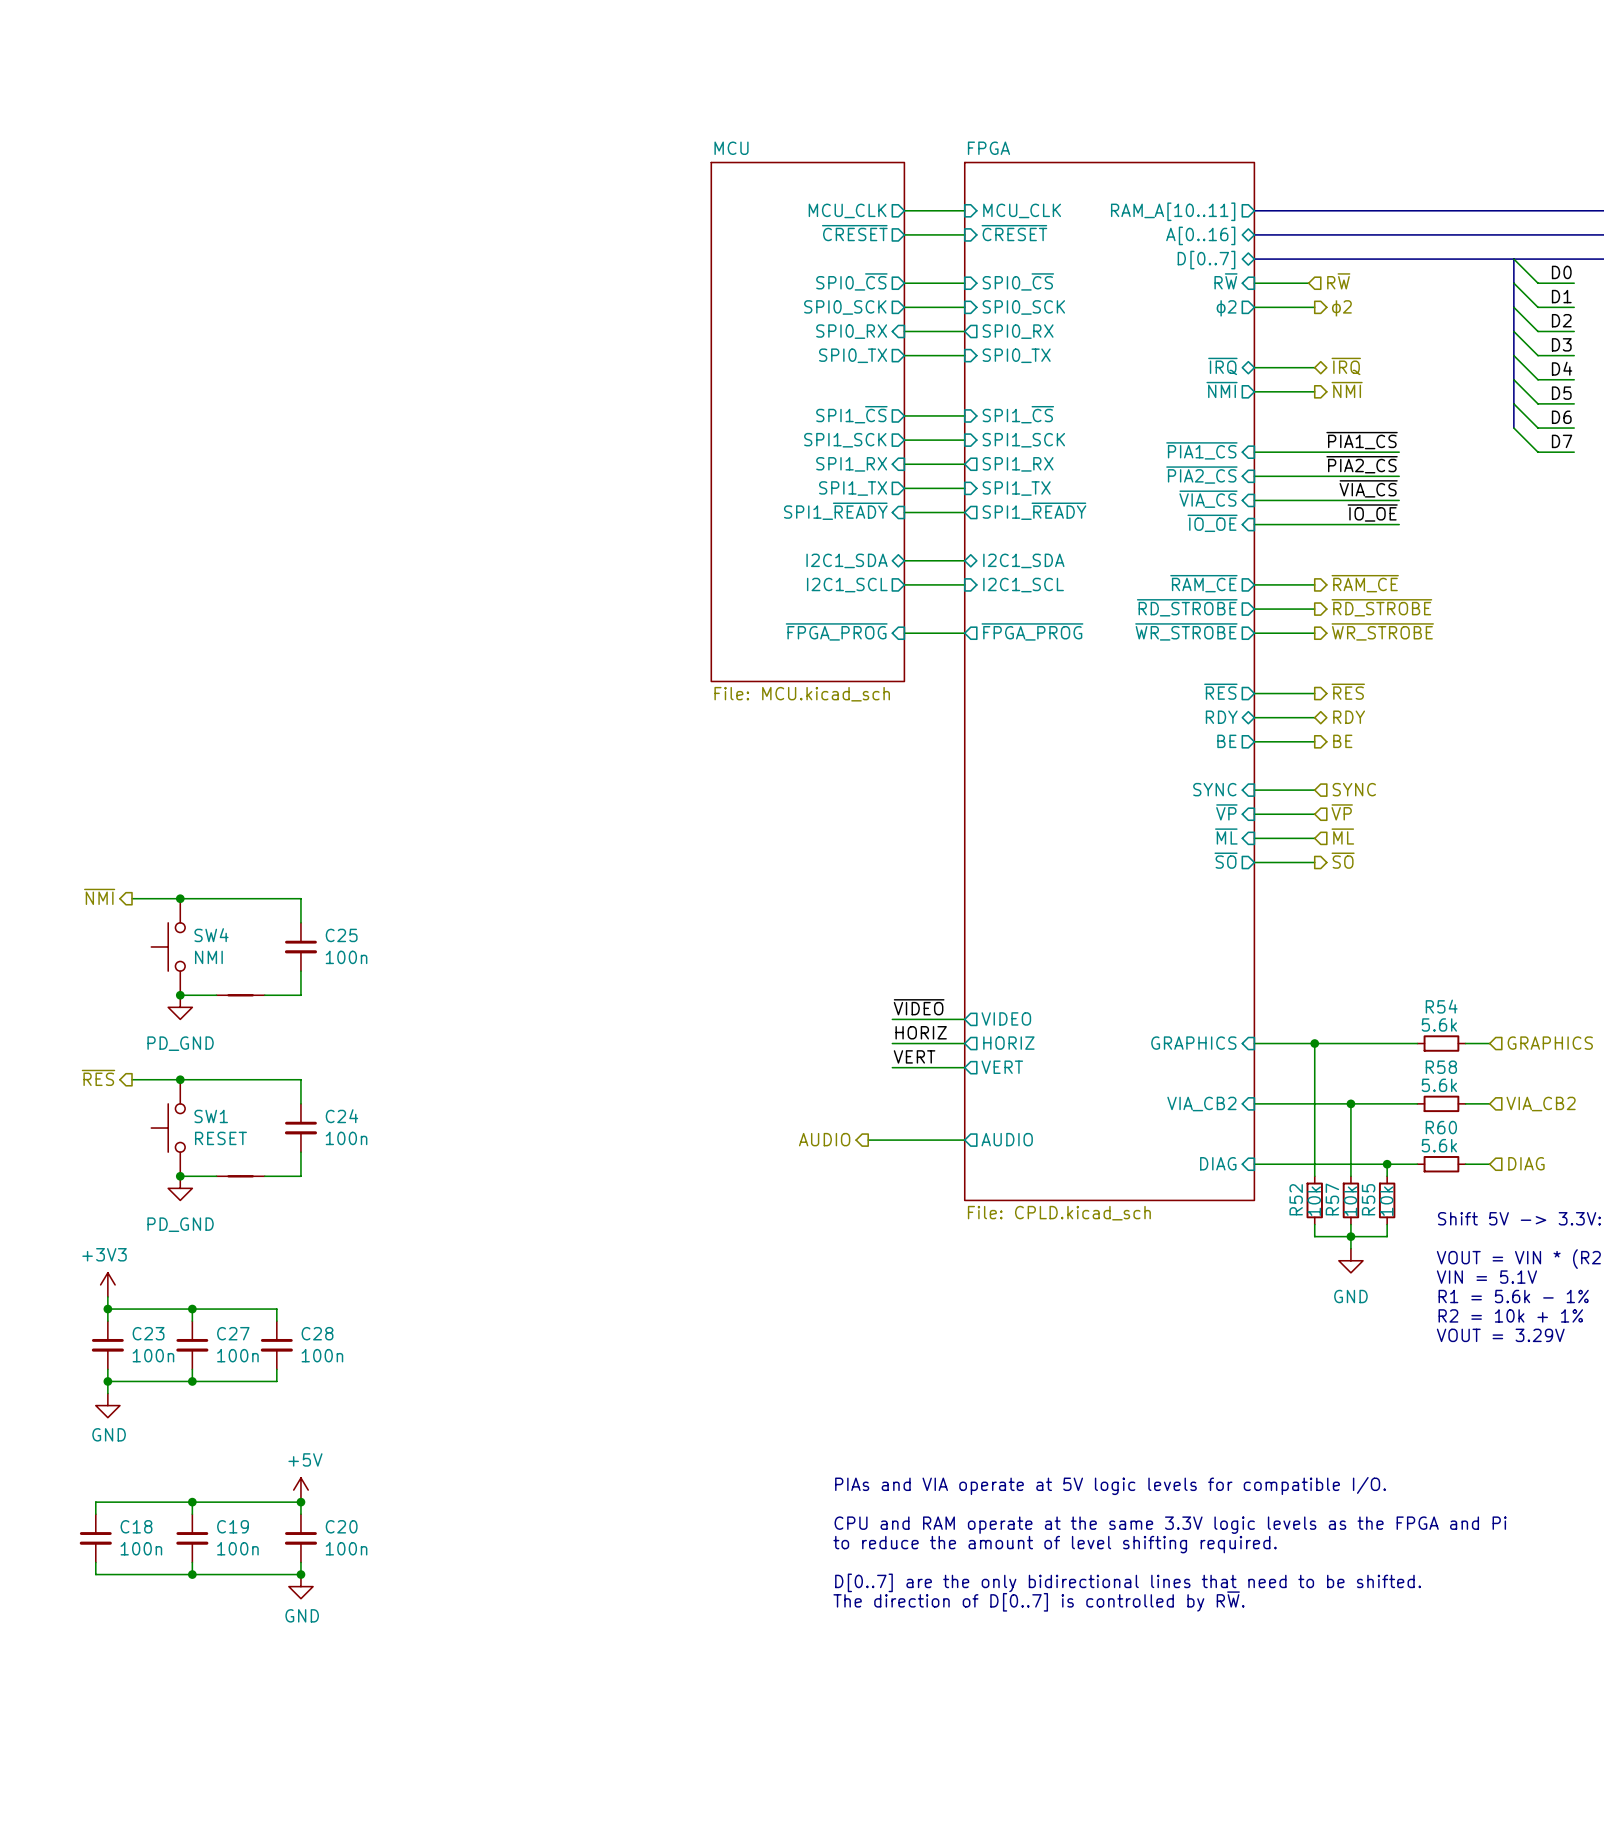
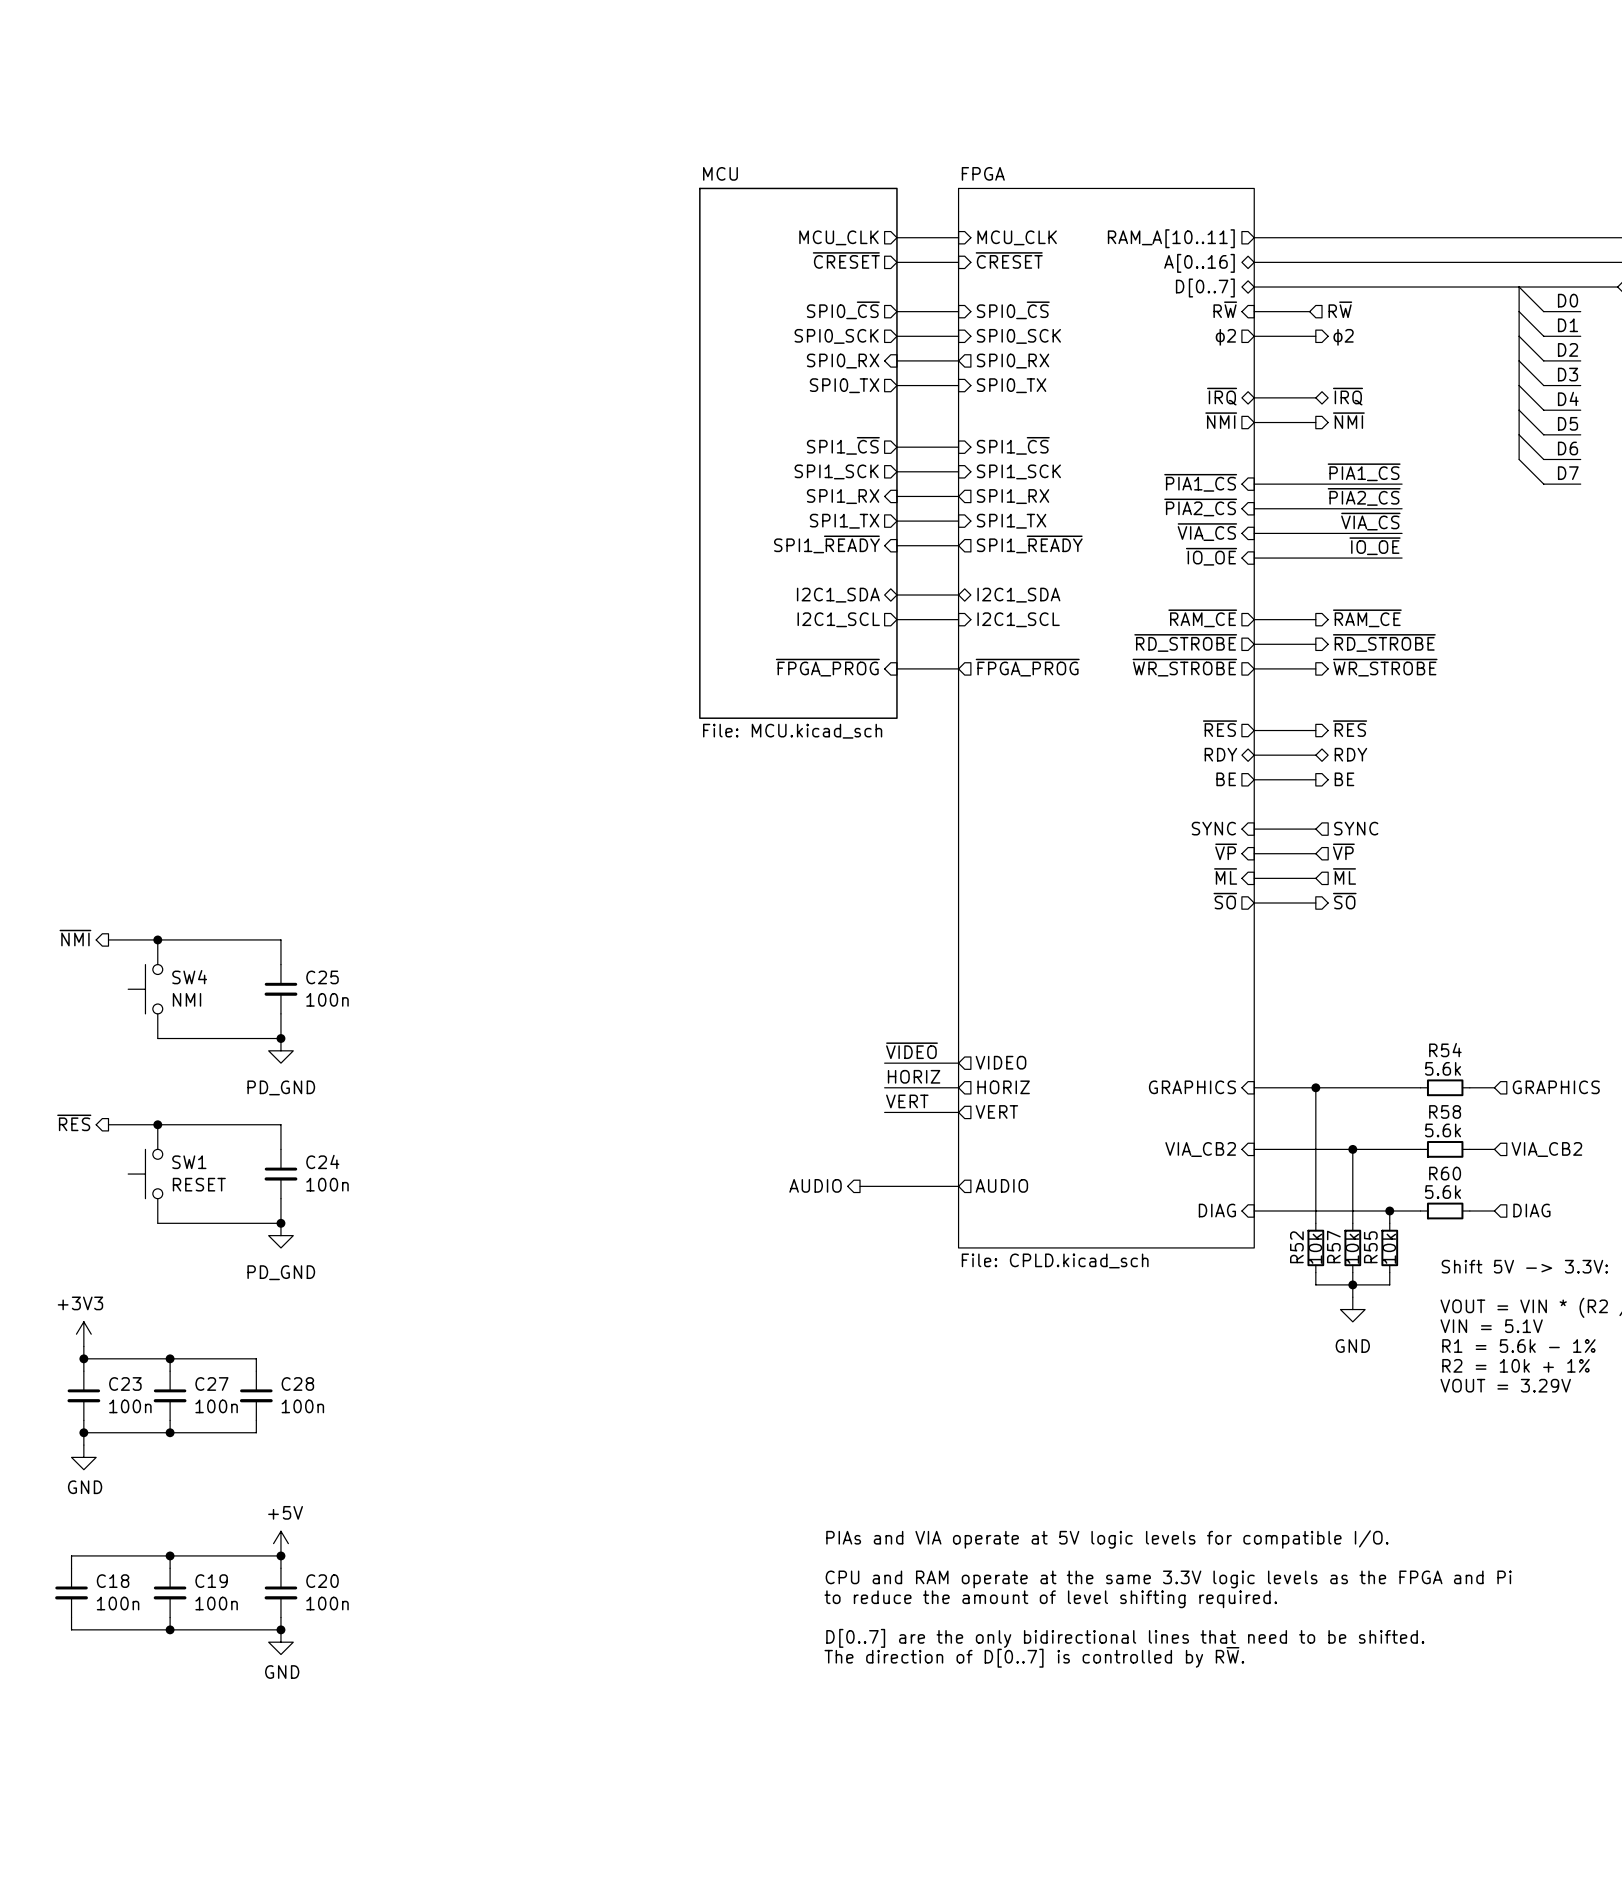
junction: (180, 995) -> none
part: (240, 995) -> none
junction: none -> (280, 1038)
power symbol: PD_GND (180, 1007) -> none
power symbol: none -> PD_GND (280, 1050)
junction: (180, 1176) -> none
part: (240, 1176) -> none
junction: none -> (280, 1223)
power symbol: PD_GND (180, 1188) -> none
power symbol: none -> PD_GND (280, 1235)

